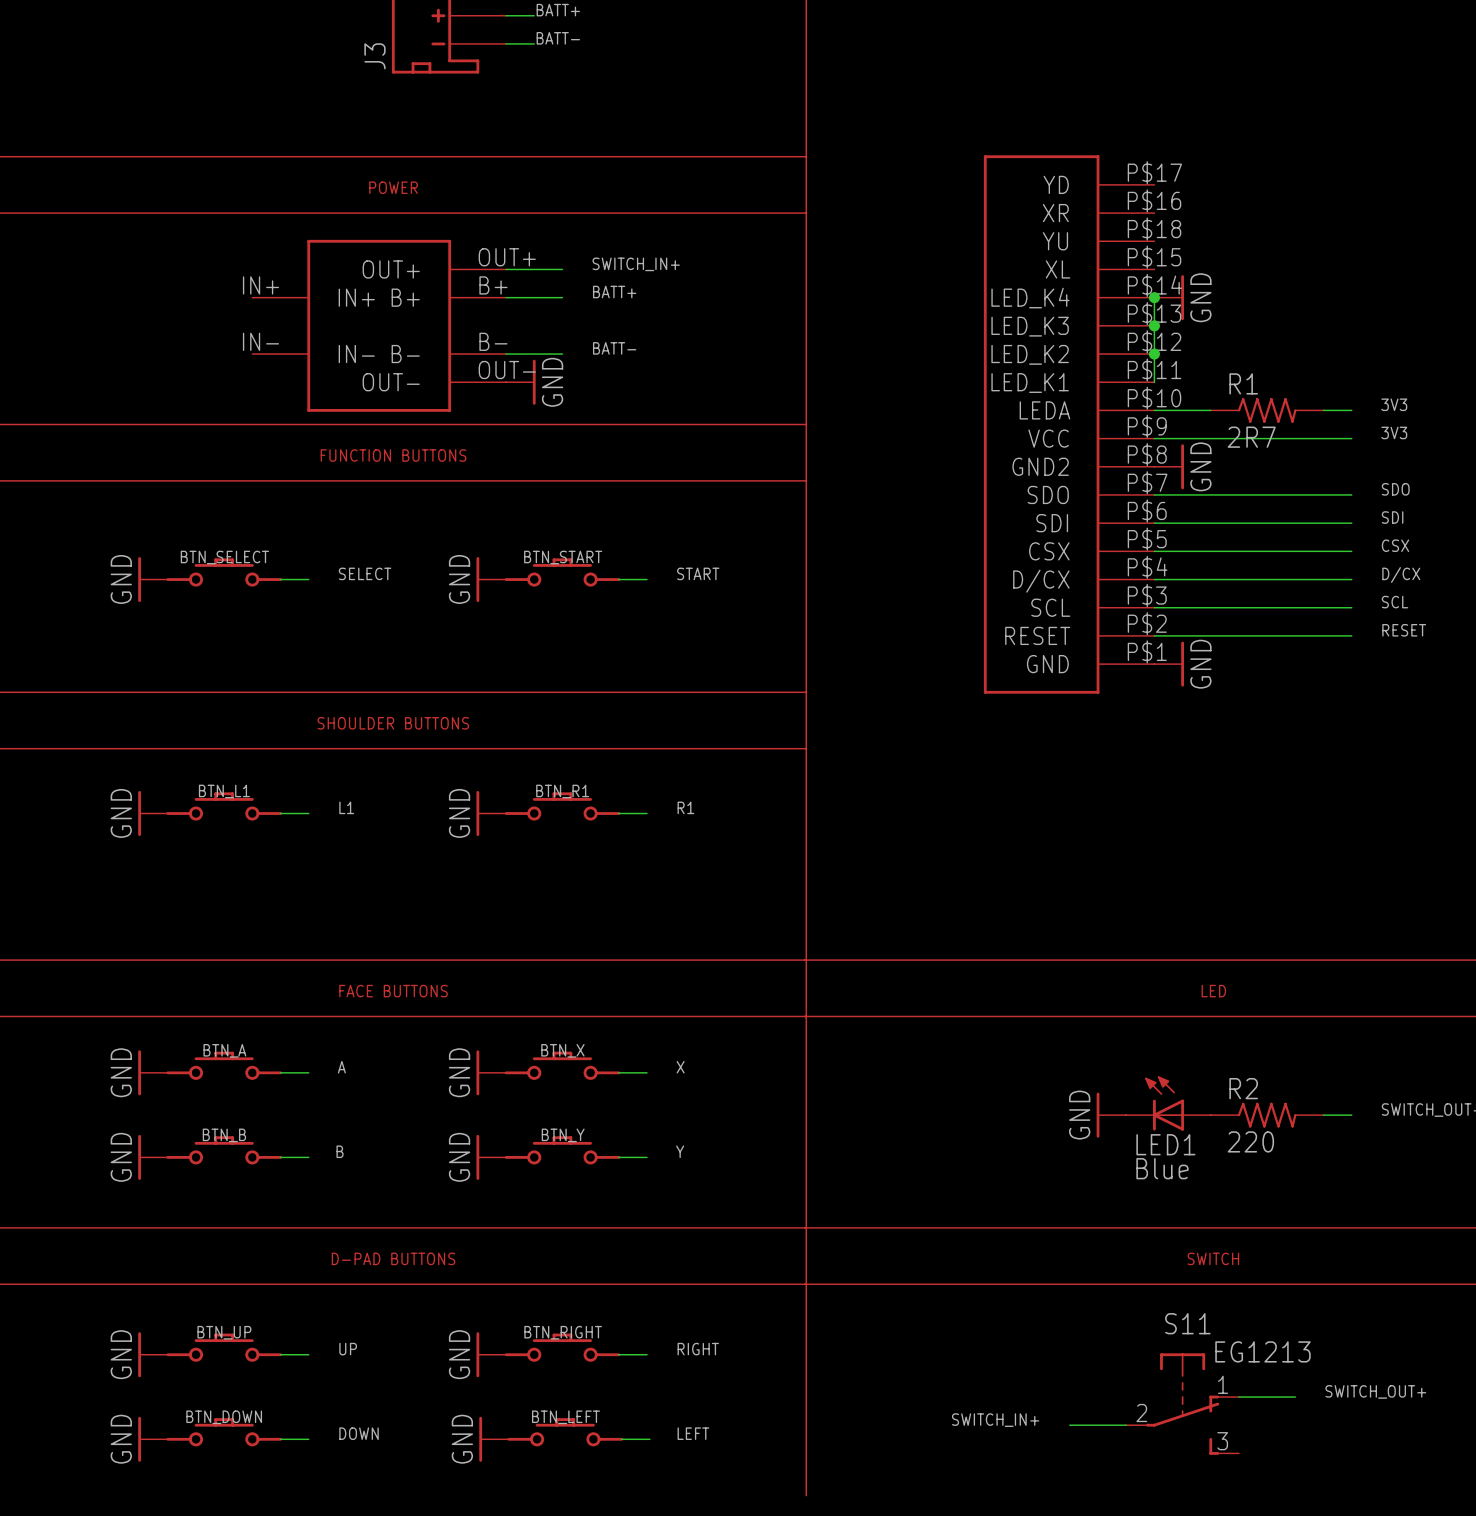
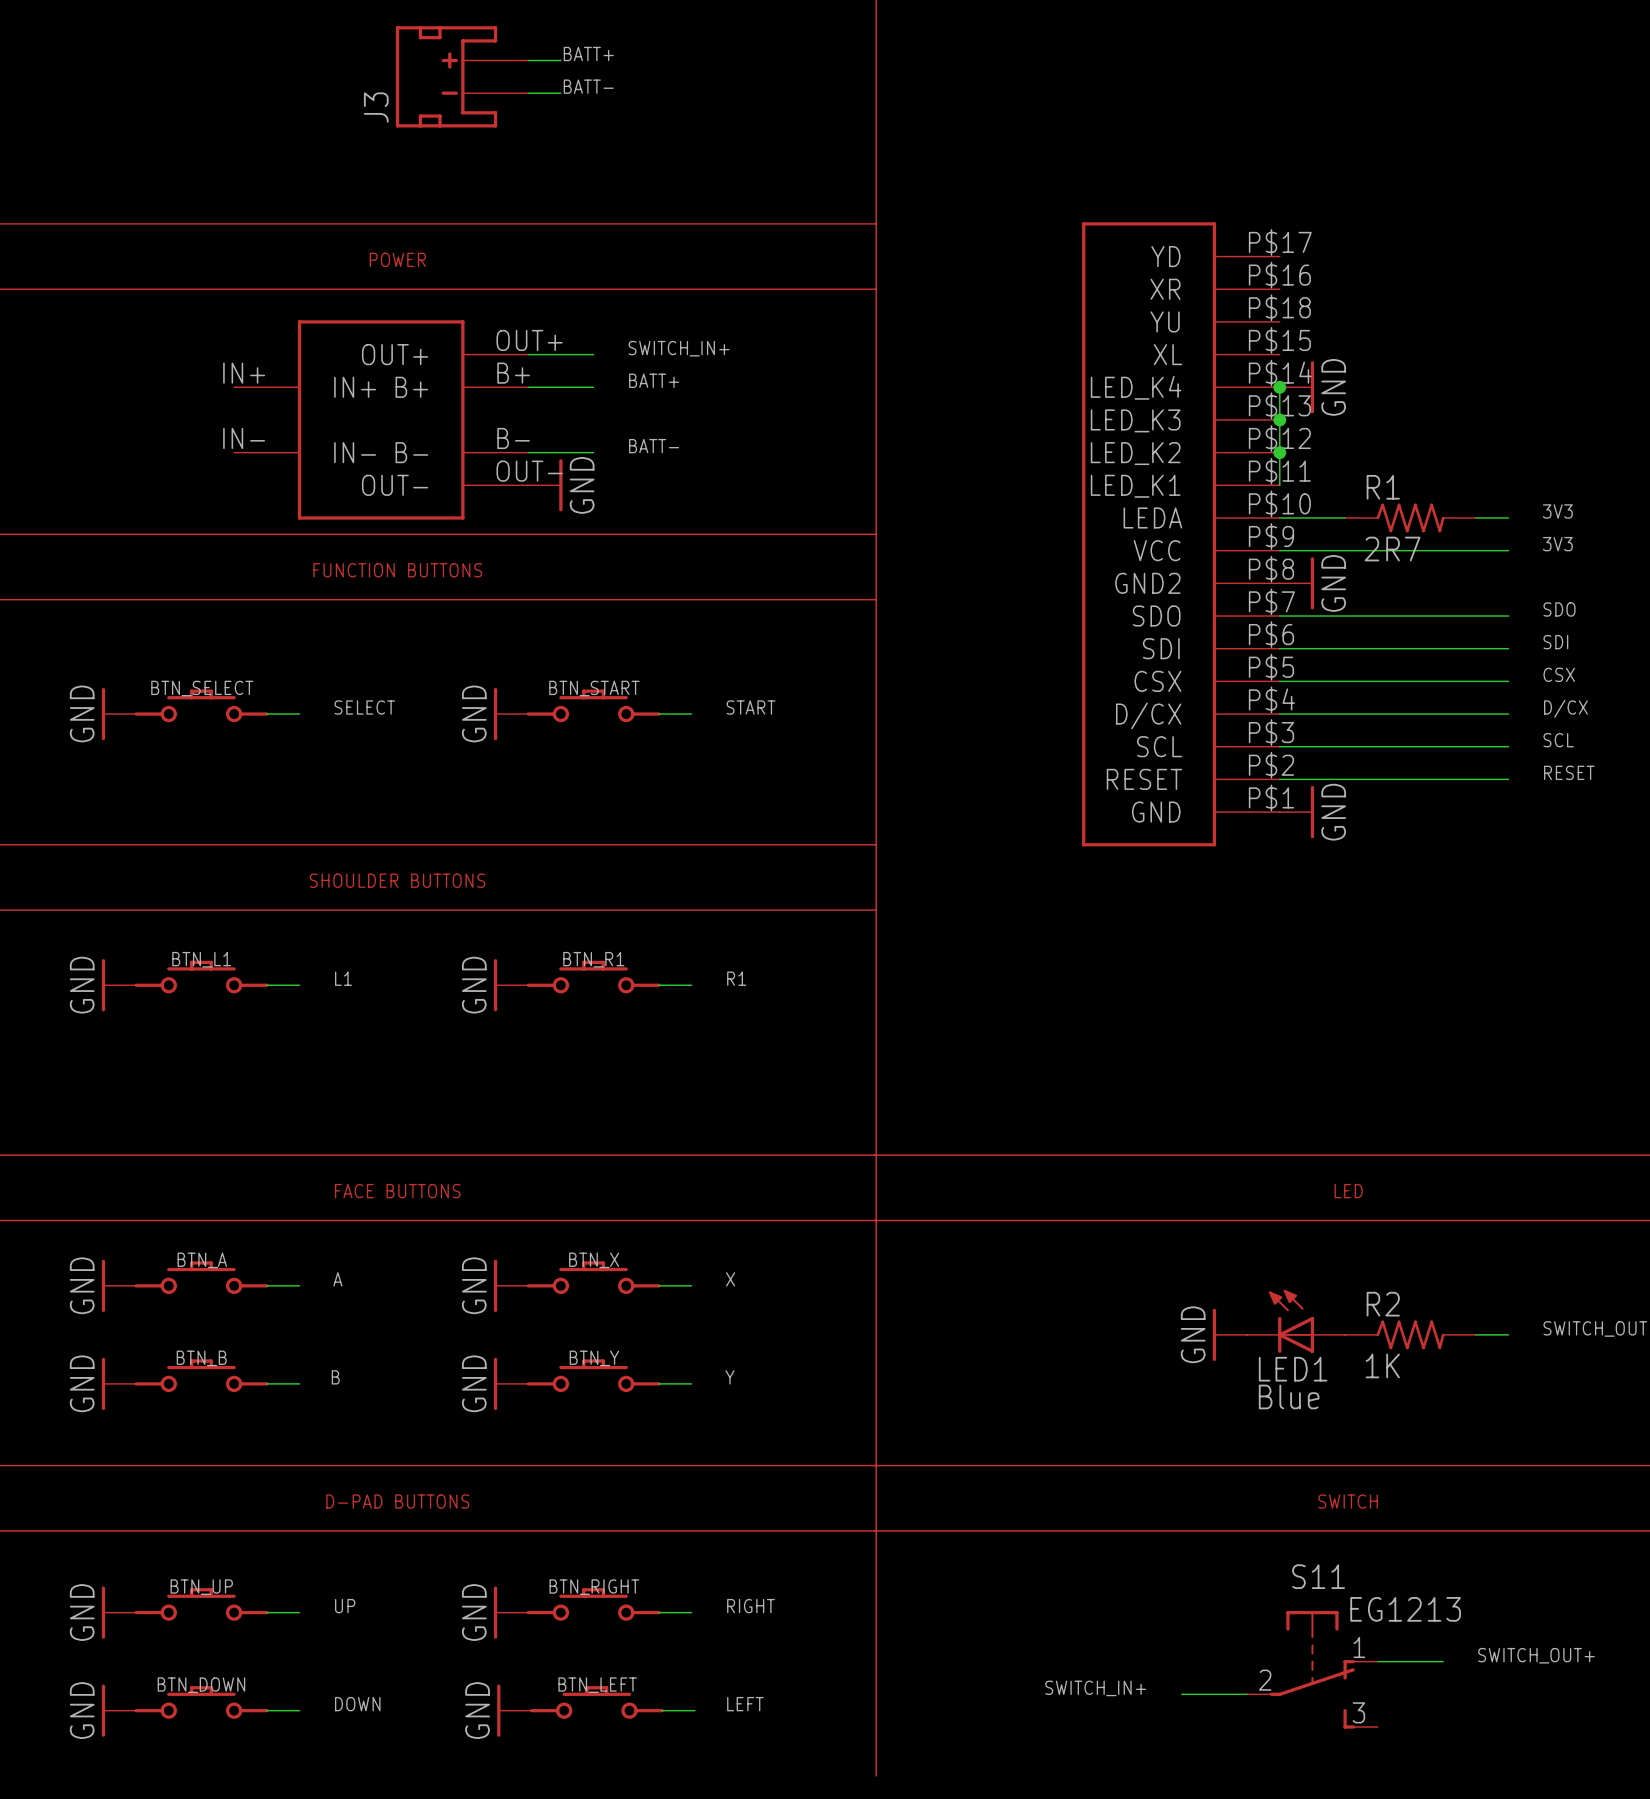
R2 value: 220 (1250, 1141) -> 1K (1382, 1365)

